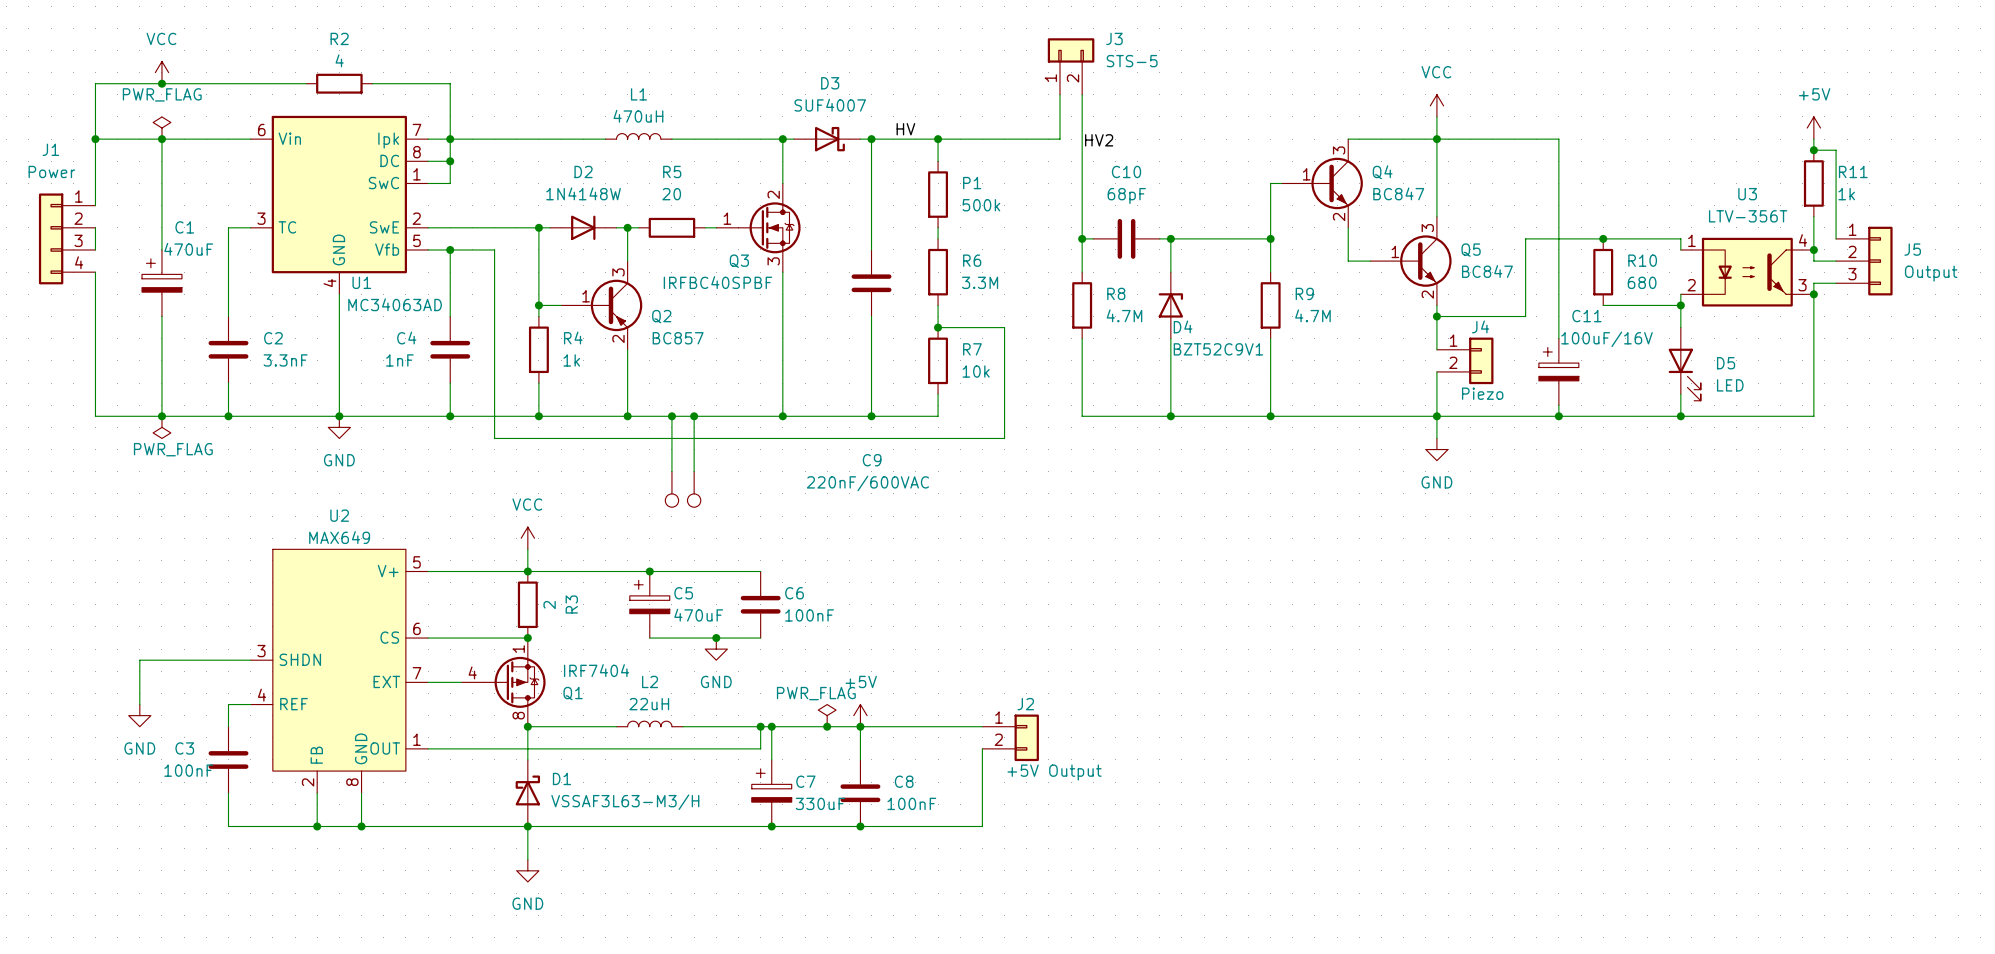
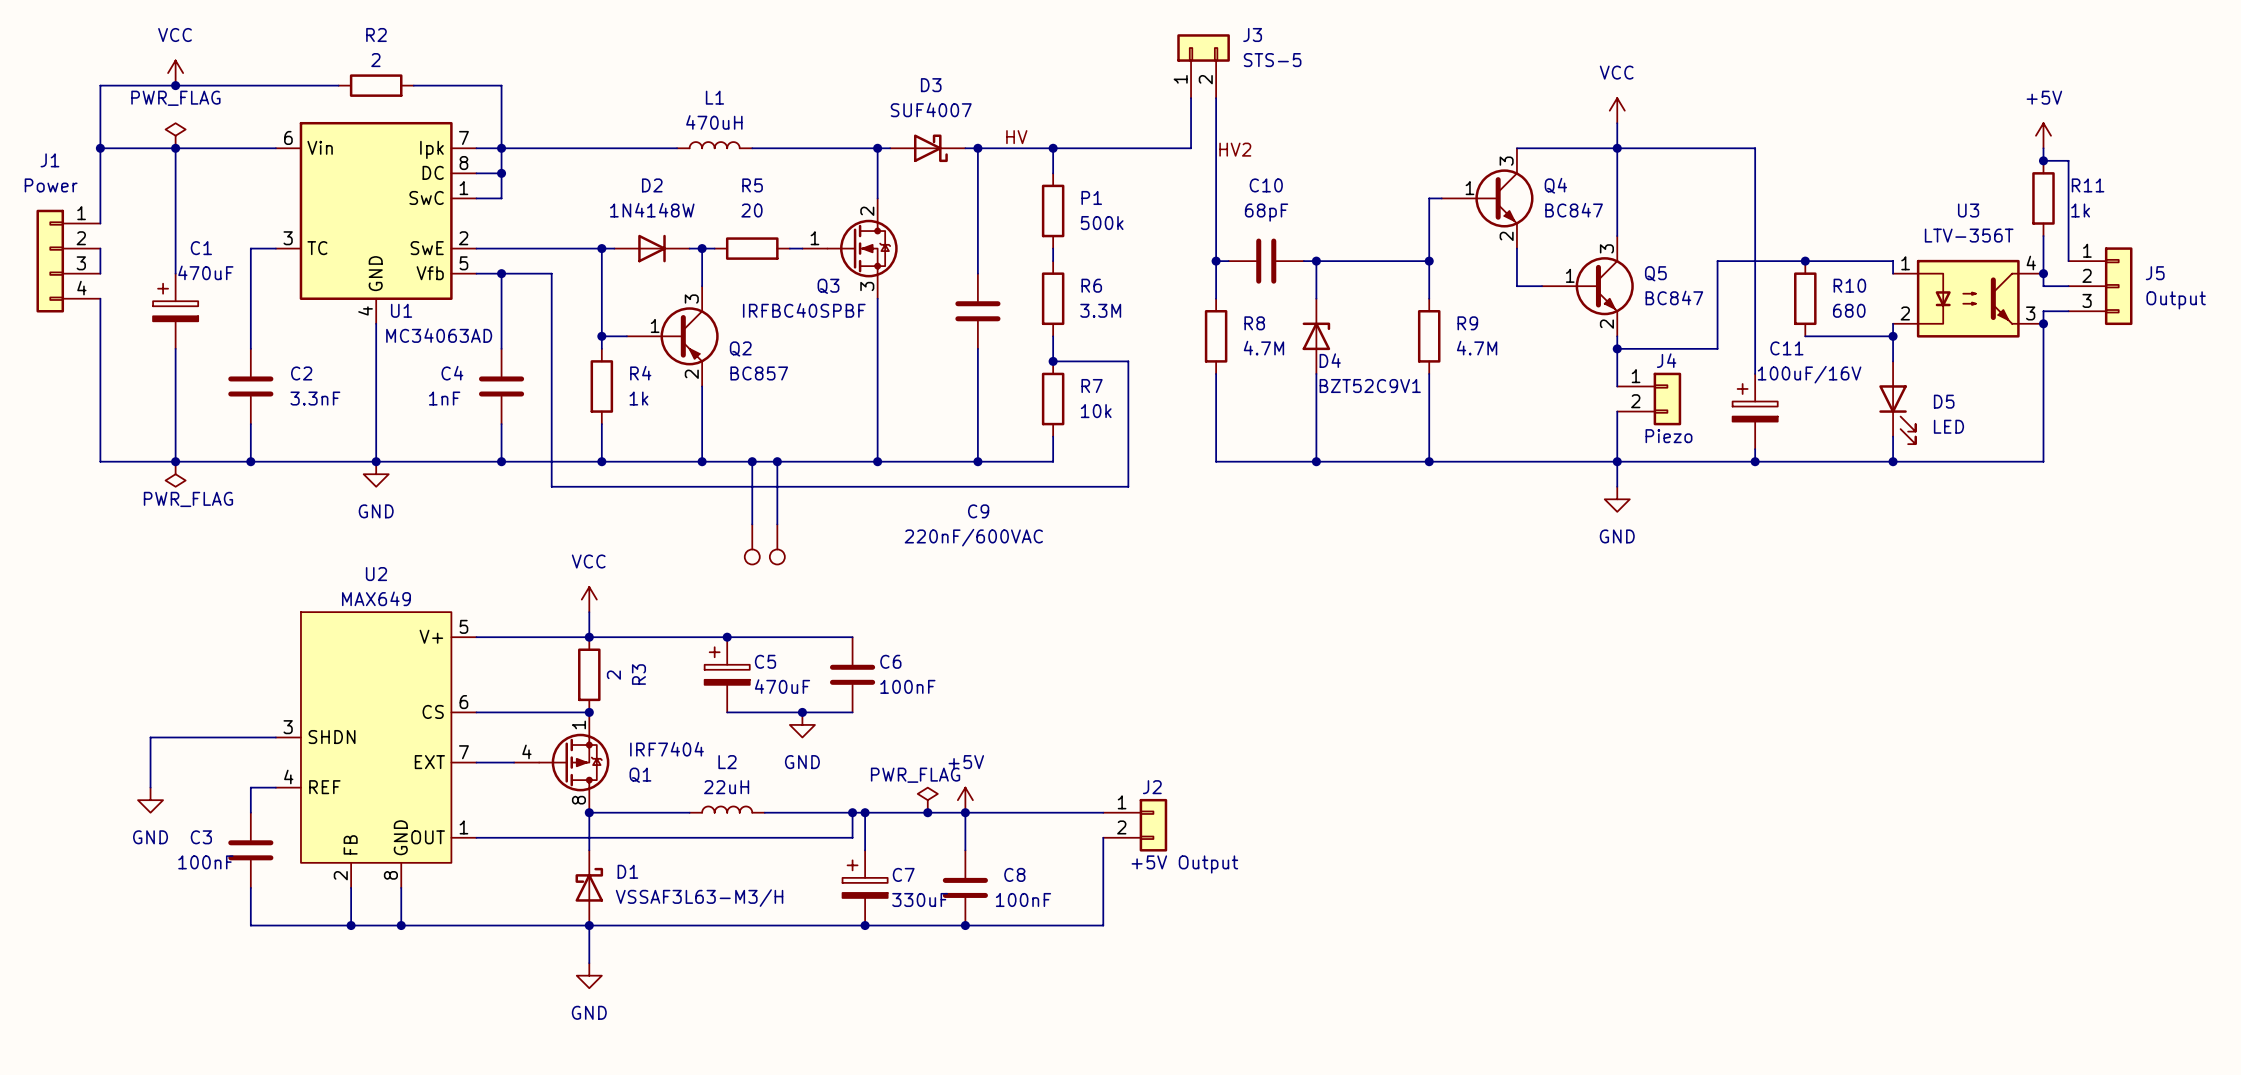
R2 value: 4 (339, 60) -> 2 (375, 60)

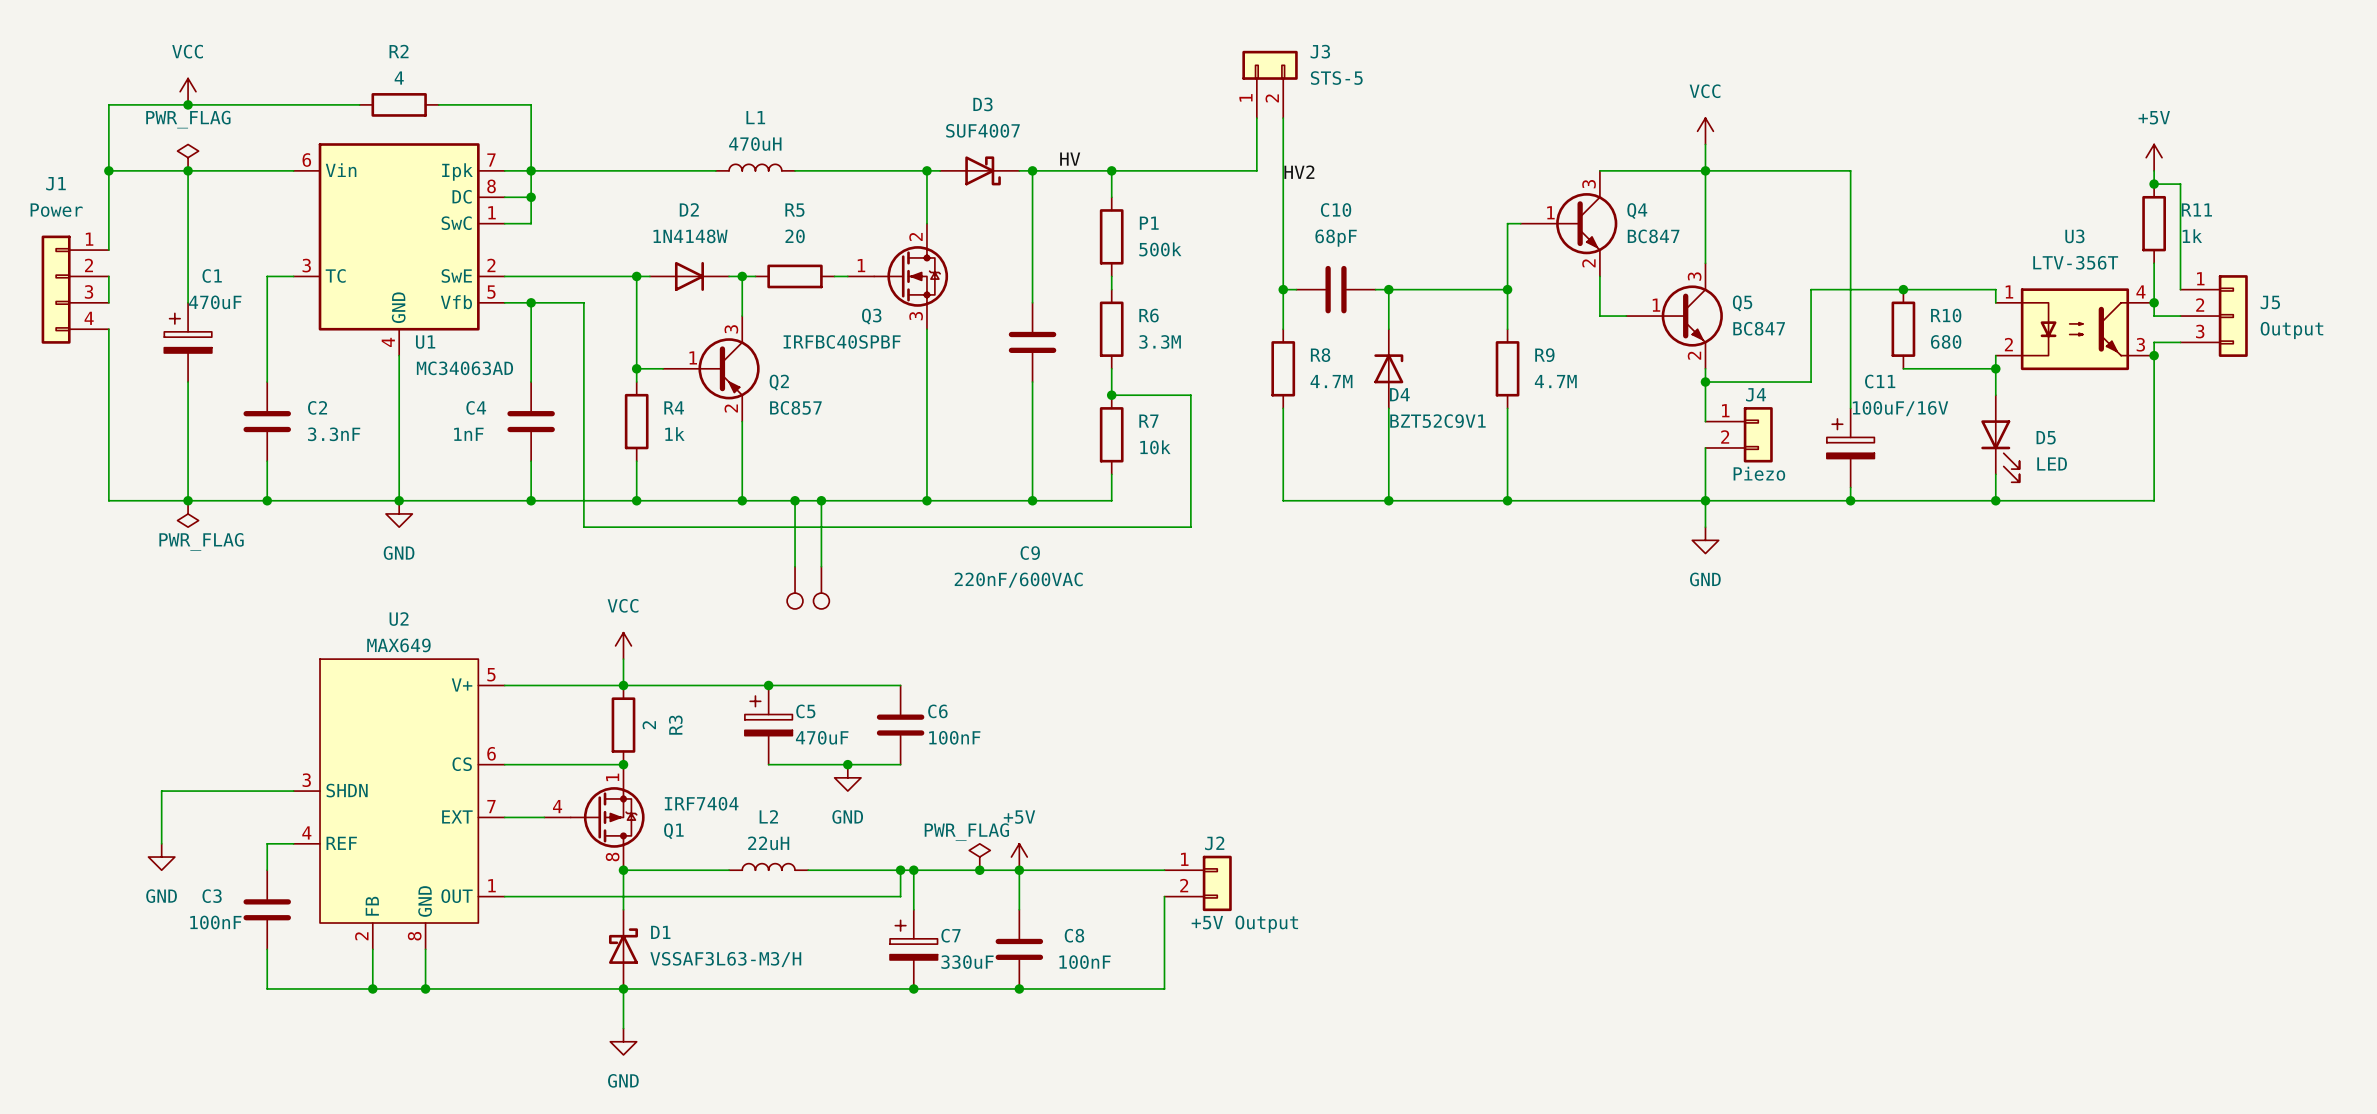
R2 value: 2 (375, 60) -> 4 (399, 78)

